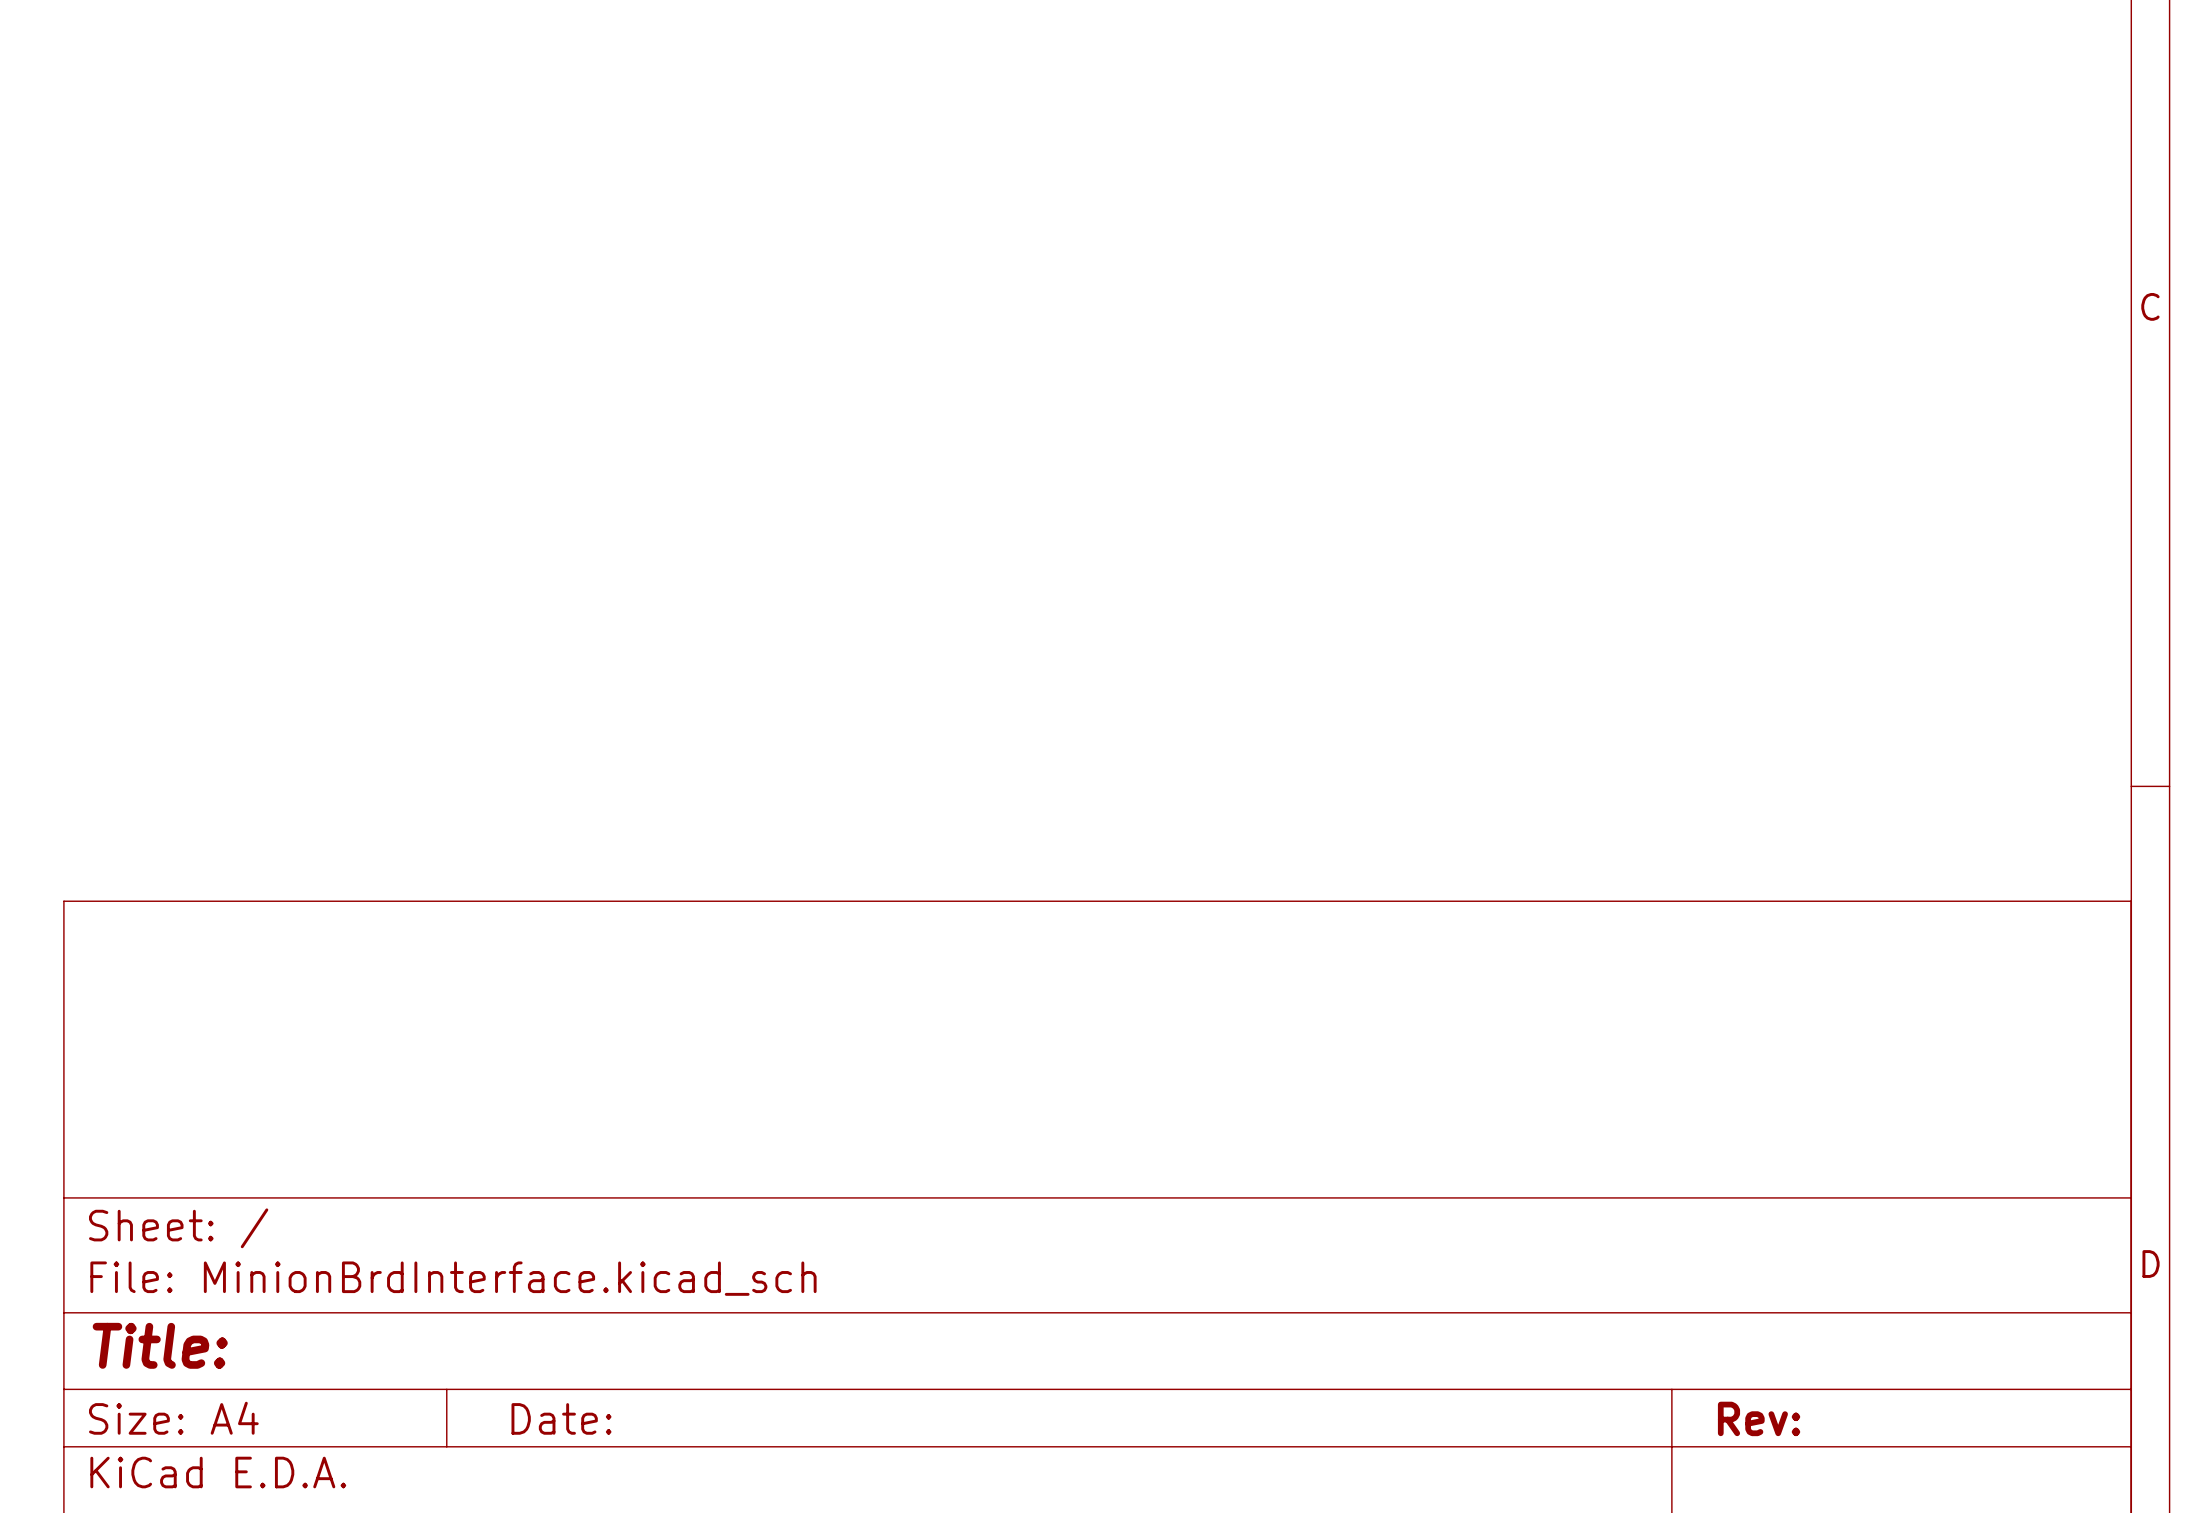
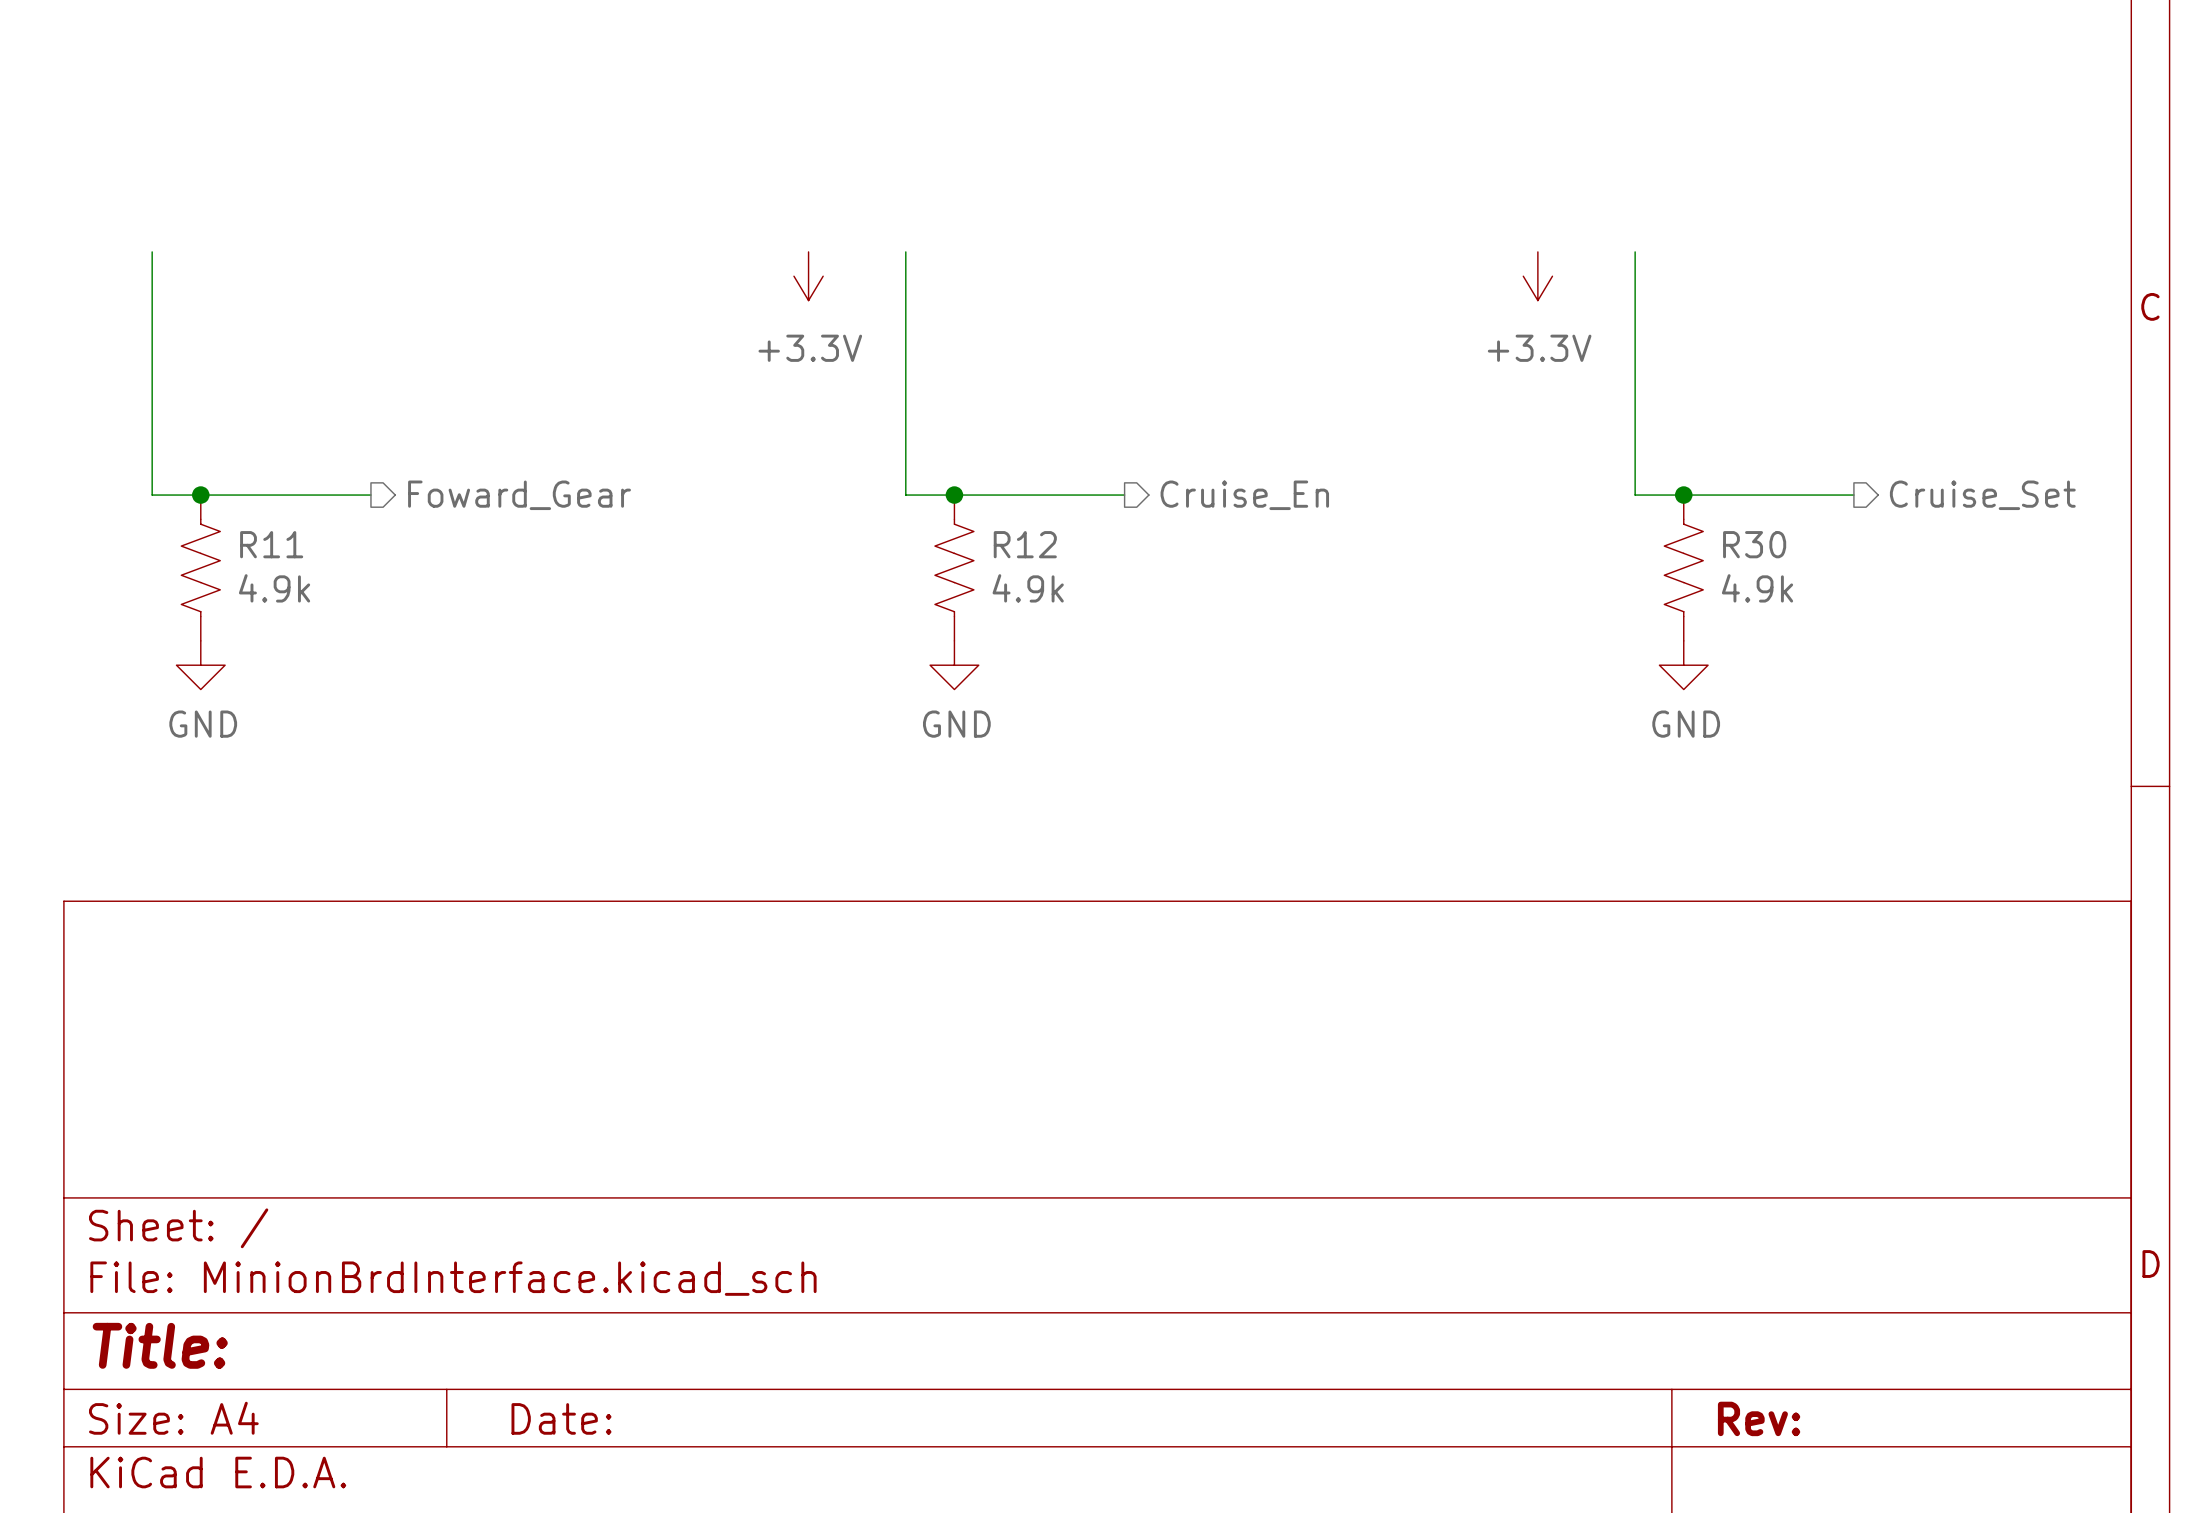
wire: none -> (152, 251) (152, 495) (370, 495)
wire: none -> (905, 251) (905, 495) (1124, 495)
wire: none -> (1635, 251) (1635, 495) (1853, 495)
power symbol: none -> +3.3V (808, 276)
power symbol: none -> +3.3V (1537, 276)
junction: none -> (200, 495)
hierarchical label: none -> Foward_Gear (519, 495)
junction: none -> (954, 495)
hierarchical label: none -> Cruise_En (1244, 495)
junction: none -> (1683, 495)
hierarchical label: none -> Cruise_Set (1982, 495)
R11: none -> 4.9k (200, 567)
R12: none -> 4.9k (954, 567)
R30: none -> 4.9k (1683, 567)
power symbol: none -> GND (200, 665)
power symbol: none -> GND (954, 665)
power symbol: none -> GND (1683, 665)

